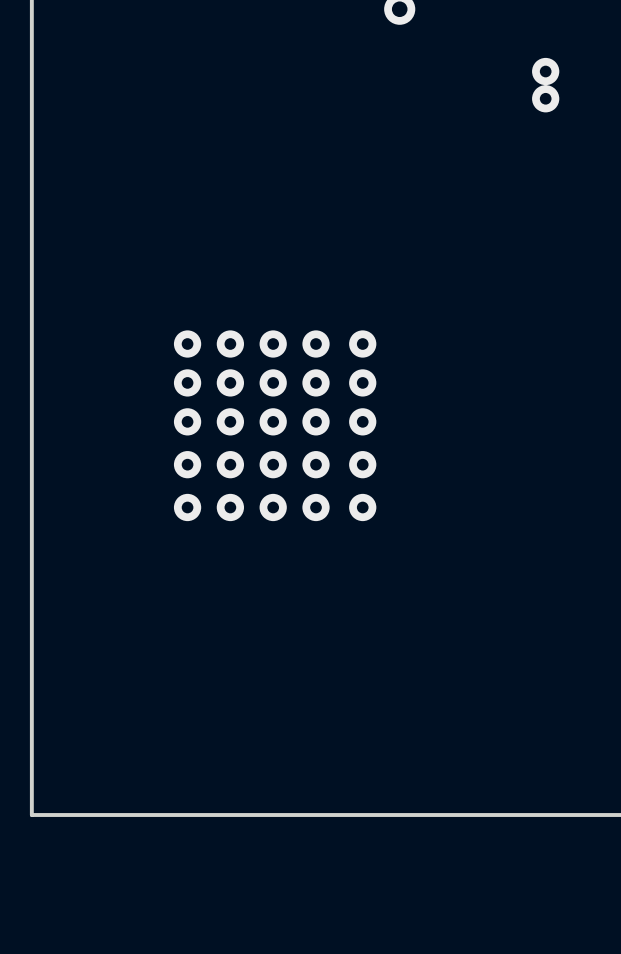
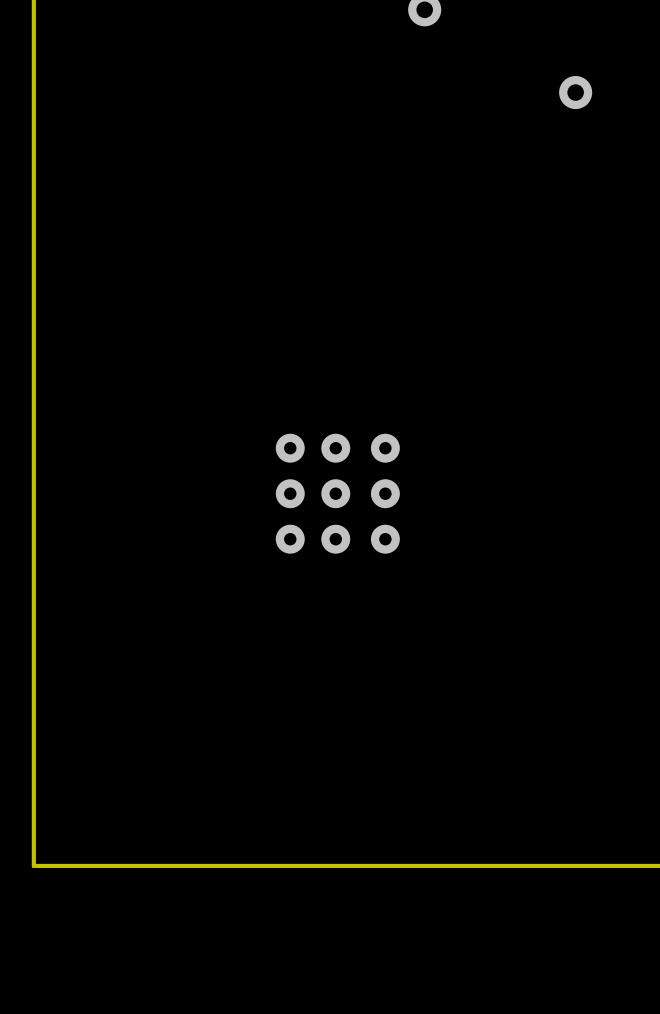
via: (545, 71) -> none
via: none -> (575, 92)
via: (545, 98) -> none
via: (187, 344) -> none
via: (230, 344) -> none
via: (273, 344) -> none
via: (316, 344) -> none
via: (362, 344) -> none
via: (187, 382) -> none
via: (230, 382) -> none
via: (273, 382) -> none
via: (316, 382) -> none
via: (362, 382) -> none
via: (187, 421) -> none
via: (230, 421) -> none
via: (187, 464) -> none
via: (230, 464) -> none
via: (187, 507) -> none
via: (230, 507) -> none

